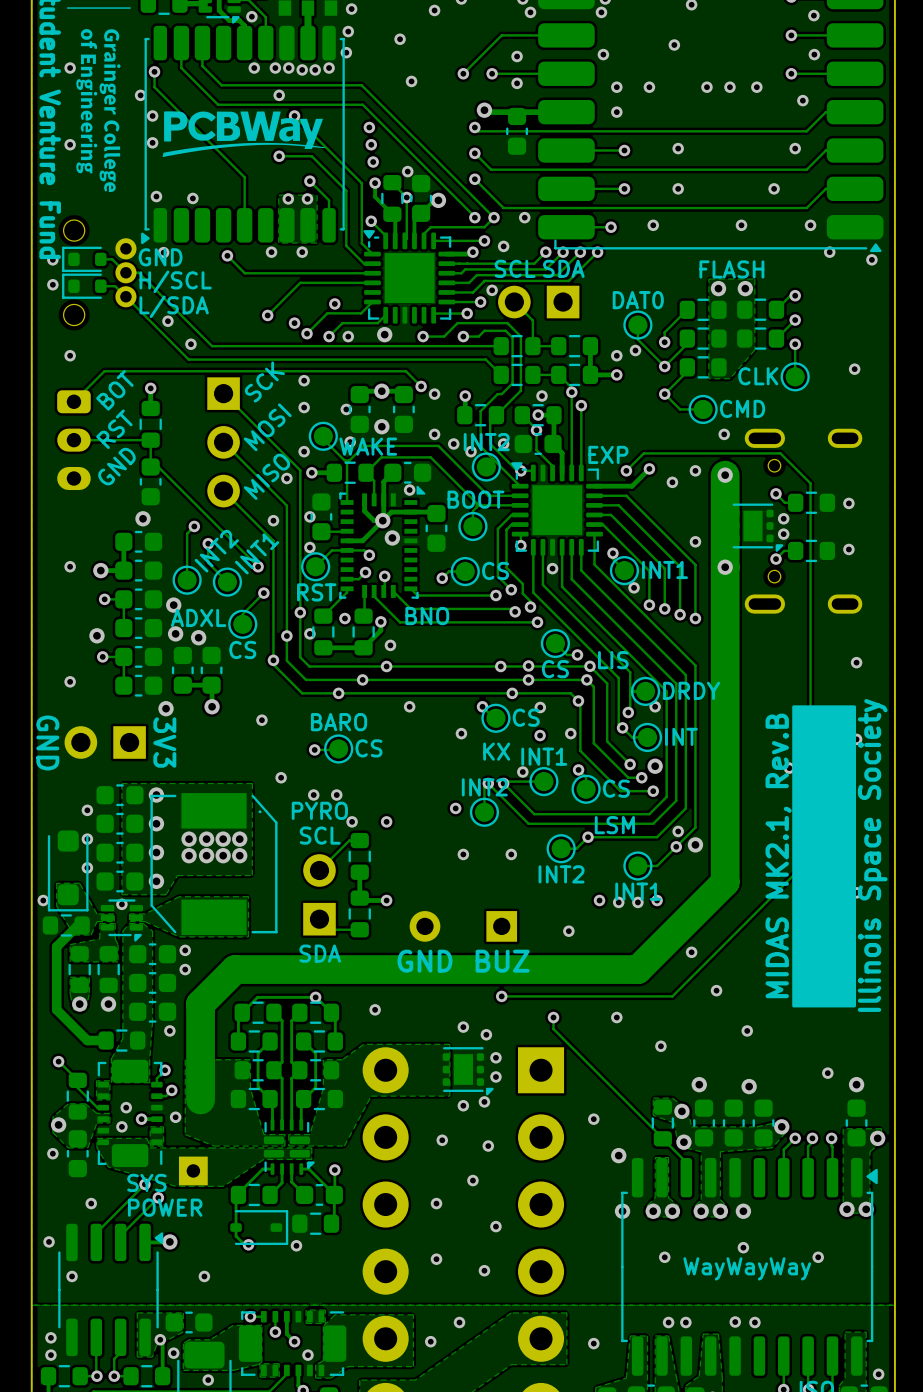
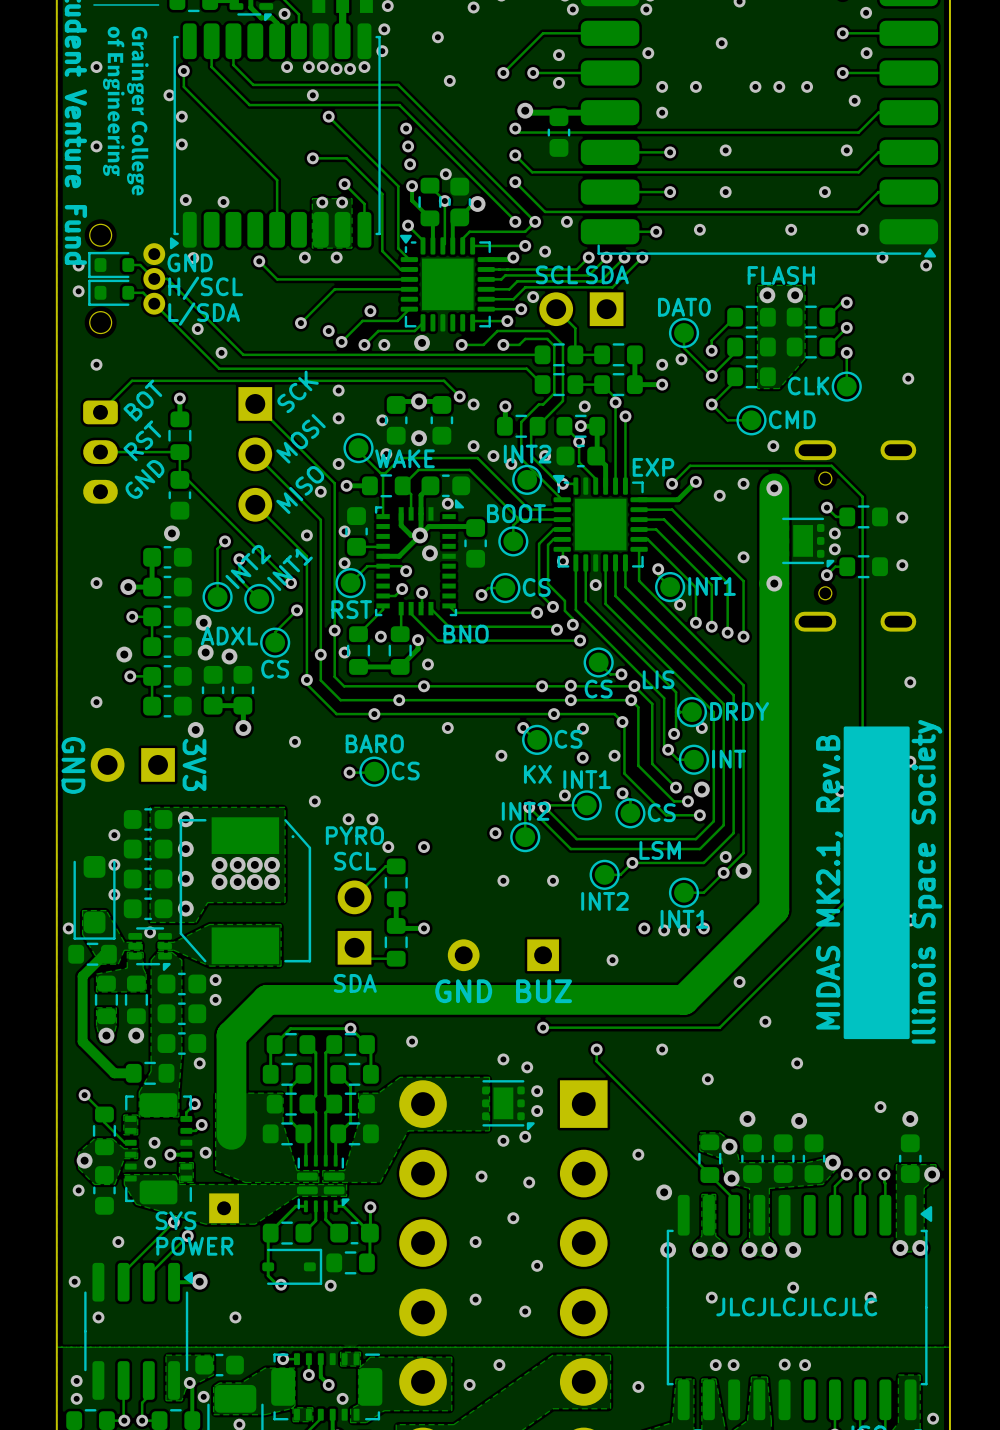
drawing: [162, 111, 326, 158] -> none
text: WayWayWay (747, 1268) -> JLCJLCJLCJLC (796, 1306)

